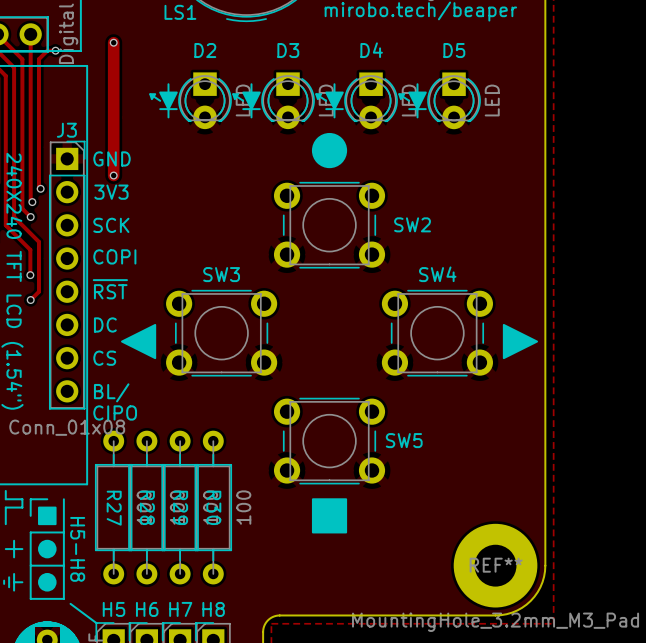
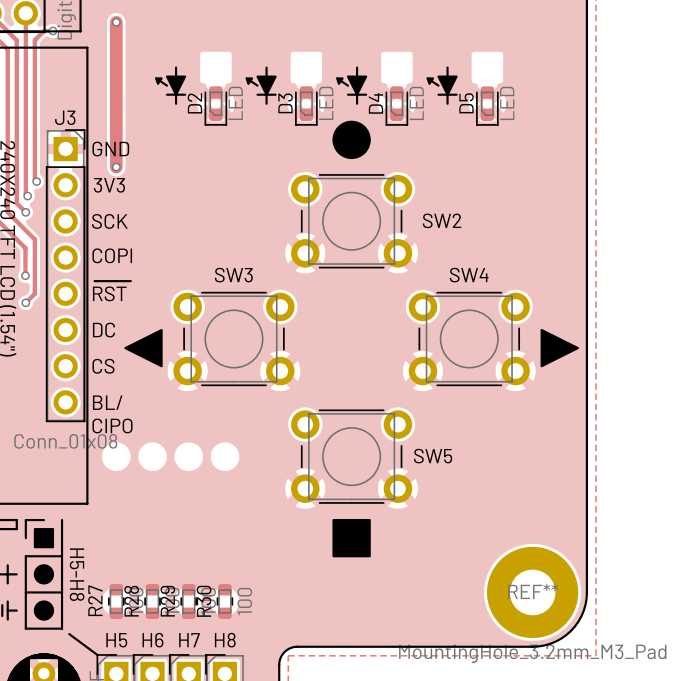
D2 name position: D2 (205, 50) -> D2 (194, 103)
D3 name position: D3 (288, 50) -> D3 (285, 103)
D4 name position: D4 (371, 50) -> D4 (375, 103)
D5 name position: D5 (454, 50) -> D5 (466, 103)
D2 footprint: [178, 72, 232, 130] -> [204, 86, 228, 126]
D3 footprint: [261, 72, 315, 130] -> [295, 86, 318, 126]
D4 footprint: [344, 72, 398, 130] -> [385, 86, 409, 126]
D5 footprint: [427, 72, 481, 130] -> [476, 86, 499, 126]
R27 footprint: [95, 430, 133, 585] -> [108, 584, 125, 619]
R28 footprint: [128, 430, 166, 585] -> [144, 584, 161, 619]
R29 footprint: [161, 430, 199, 585] -> [180, 584, 198, 619]
R30 footprint: [194, 430, 233, 585] -> [216, 584, 234, 619]

